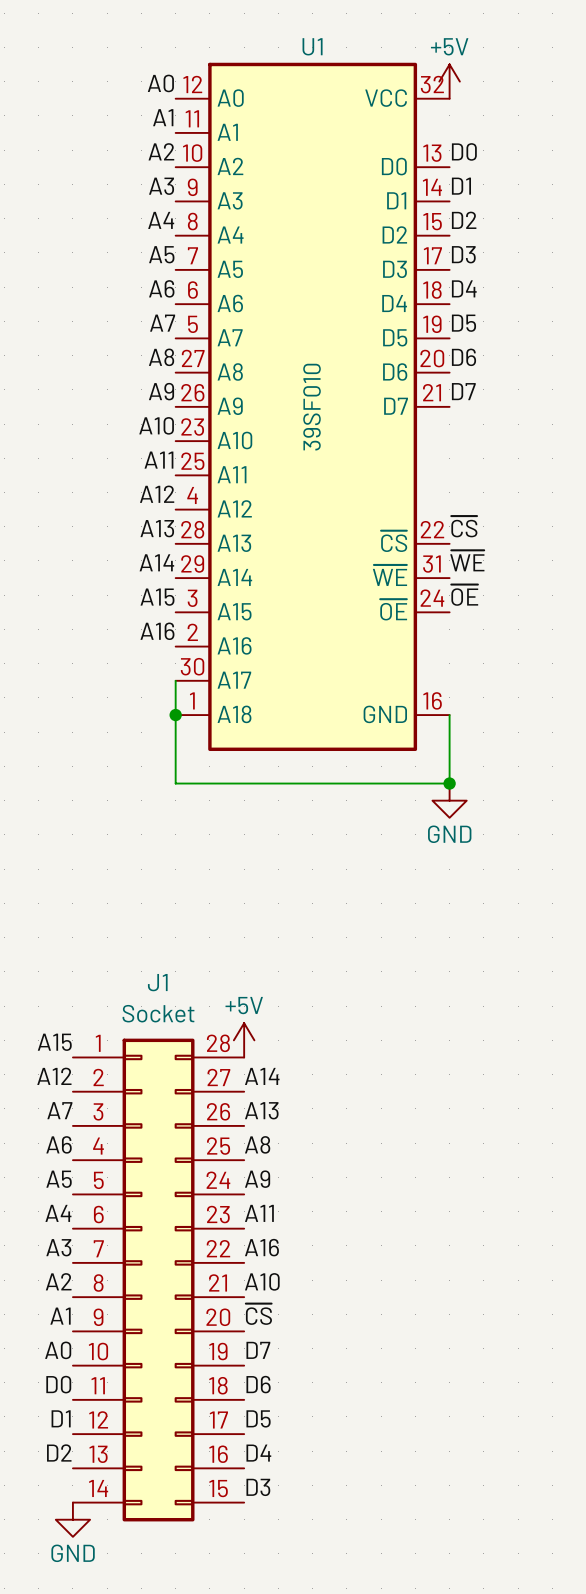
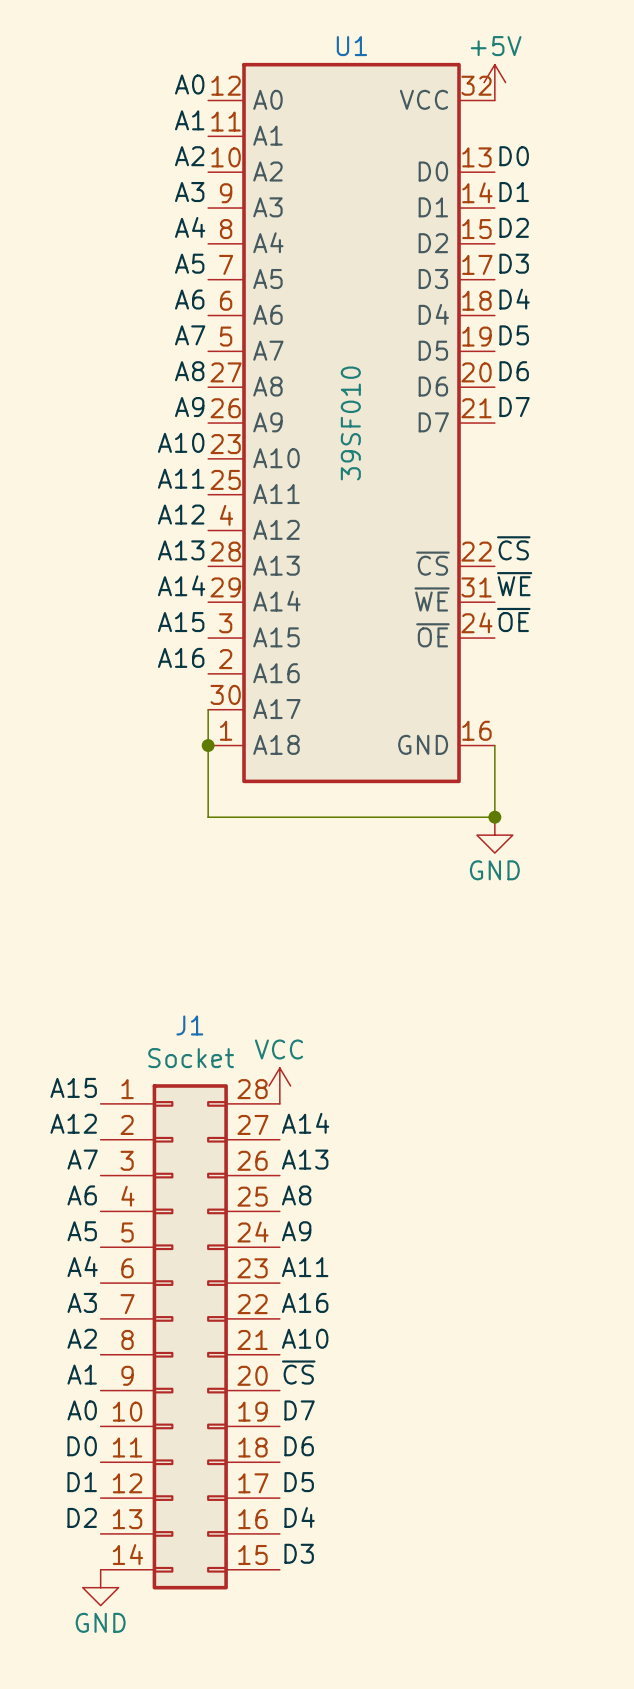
power symbol: +5V (244, 1040) -> VCC (279, 1085)

